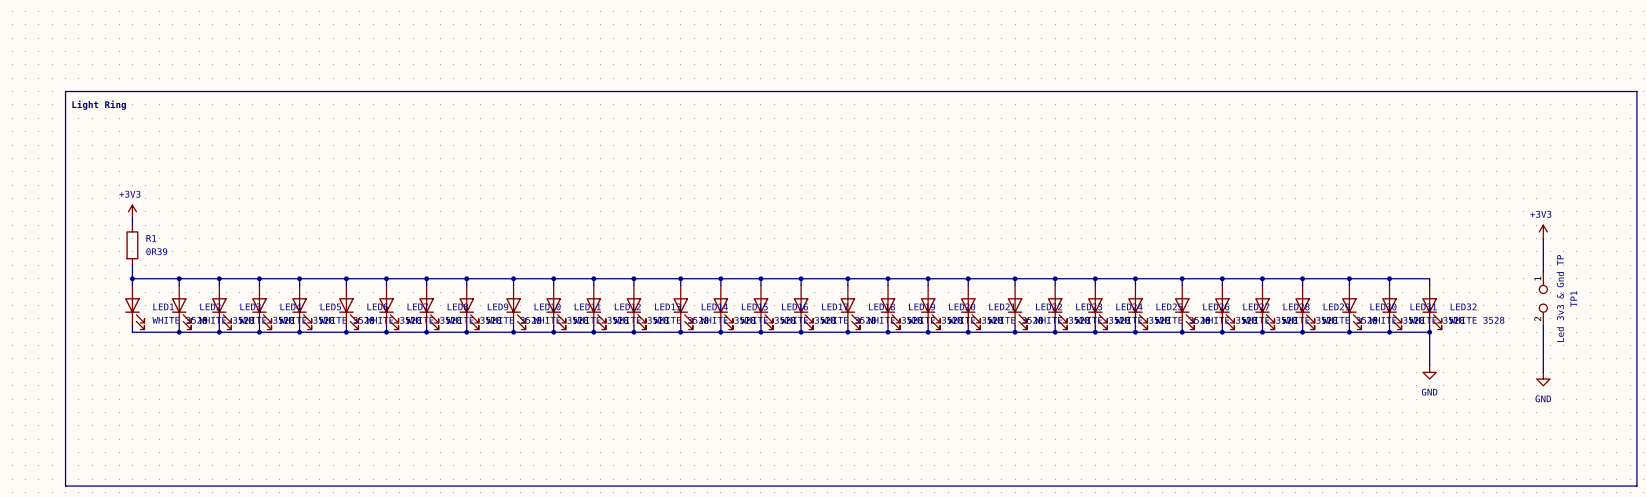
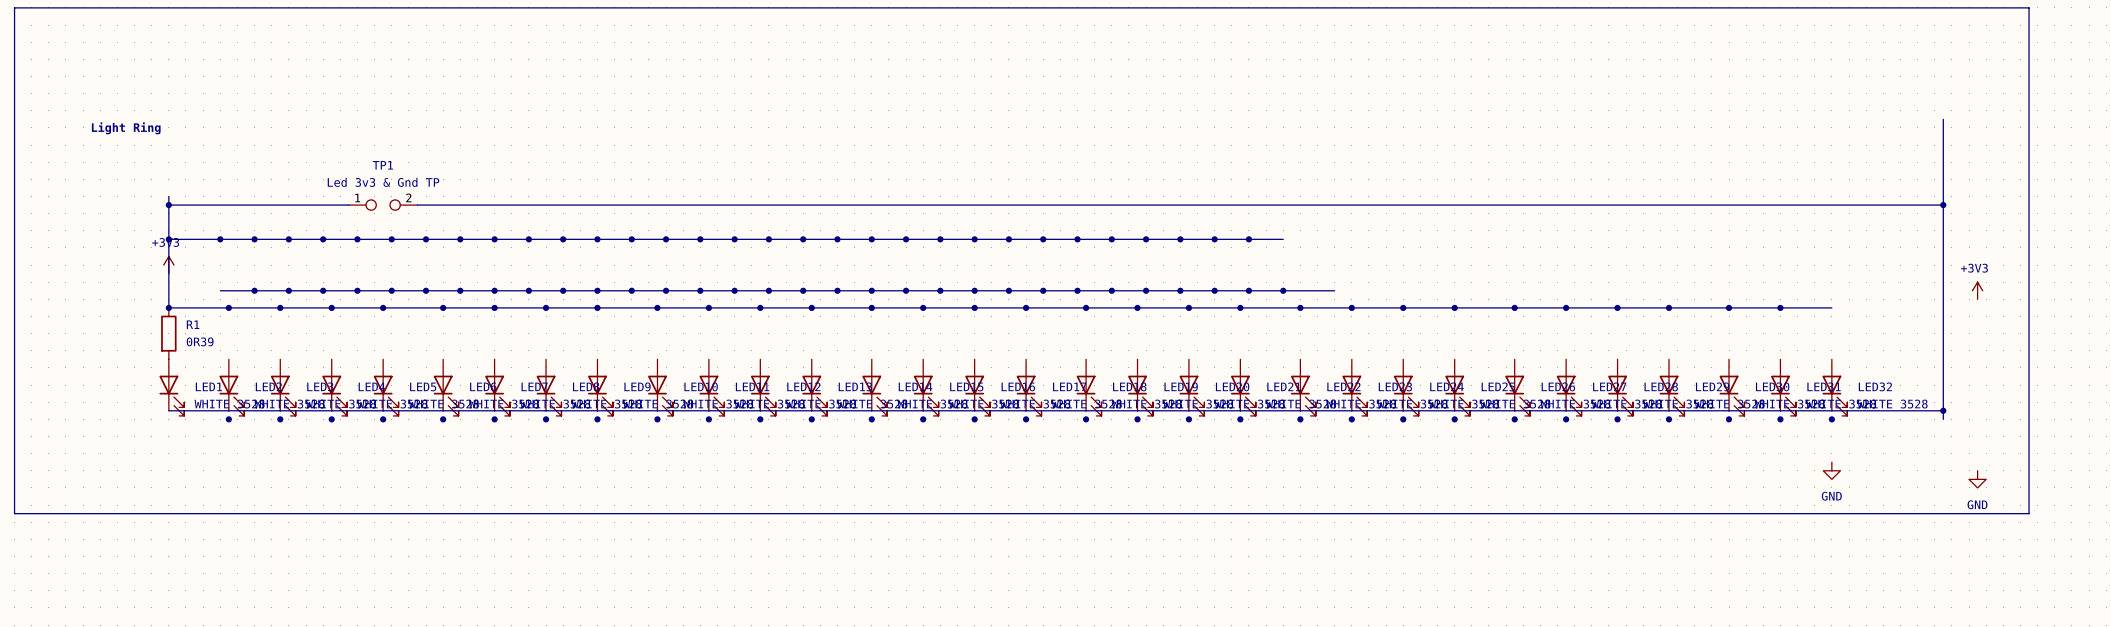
line: (65, 91) (1636, 91) (1636, 486) (65, 486) (65, 91) -> (14, 7) (2029, 7) (2029, 513) (14, 513) (14, 7)
wire: none -> (1943, 119) (1943, 419)
wire: none -> (168, 196) (168, 273)
wire: none -> (168, 205) (348, 205)
junction: none -> (168, 205)
wire: none -> (417, 205) (1943, 205)
junction: none -> (1943, 205)
wire: none -> (168, 239) (1283, 239)
junction: none -> (168, 239)
junction: none -> (220, 239)
junction: none -> (254, 239)
junction: none -> (288, 239)
junction: none -> (323, 239)
junction: none -> (357, 239)
junction: none -> (391, 239)
junction: none -> (426, 239)
junction: none -> (460, 239)
junction: none -> (494, 239)
junction: none -> (528, 239)
junction: none -> (563, 239)
junction: none -> (597, 239)
junction: none -> (631, 239)
junction: none -> (666, 239)
junction: none -> (700, 239)
junction: none -> (734, 239)
junction: none -> (768, 239)
junction: none -> (803, 239)
junction: none -> (837, 239)
junction: none -> (871, 239)
junction: none -> (906, 239)
junction: none -> (940, 239)
junction: none -> (974, 239)
junction: none -> (1008, 239)
junction: none -> (1043, 239)
junction: none -> (1077, 239)
junction: none -> (1111, 239)
junction: none -> (1146, 239)
junction: none -> (1180, 239)
junction: none -> (1214, 239)
junction: none -> (1248, 239)
wire: none -> (168, 282) (168, 307) (1831, 307)
wire: none -> (220, 290) (1334, 290)
junction: none -> (254, 290)
junction: none -> (288, 290)
junction: none -> (323, 290)
junction: none -> (357, 290)
junction: none -> (391, 290)
junction: none -> (426, 290)
junction: none -> (460, 290)
junction: none -> (494, 290)
junction: none -> (528, 290)
junction: none -> (563, 290)
junction: none -> (597, 290)
junction: none -> (631, 290)
junction: none -> (666, 290)
junction: none -> (700, 290)
junction: none -> (734, 290)
junction: none -> (768, 290)
junction: none -> (803, 290)
junction: none -> (837, 290)
junction: none -> (871, 290)
junction: none -> (906, 290)
junction: none -> (940, 290)
junction: none -> (974, 290)
junction: none -> (1008, 290)
junction: none -> (1043, 290)
junction: none -> (1077, 290)
junction: none -> (1111, 290)
junction: none -> (1146, 290)
junction: none -> (1180, 290)
junction: none -> (1214, 290)
junction: none -> (1248, 290)
junction: none -> (1283, 290)
wire: (1543, 238) (1543, 272) -> none
junction: none -> (168, 307)
R1 position: (132, 245) -> (168, 333)
junction: none -> (228, 307)
junction: none -> (280, 307)
junction: none -> (331, 307)
junction: none -> (383, 307)
junction: none -> (443, 307)
junction: none -> (494, 307)
junction: none -> (546, 307)
junction: none -> (597, 307)
junction: none -> (657, 307)
junction: none -> (708, 307)
junction: none -> (760, 307)
junction: none -> (811, 307)
junction: none -> (871, 307)
junction: none -> (923, 307)
junction: none -> (974, 307)
junction: none -> (1026, 307)
junction: none -> (1086, 307)
junction: none -> (1137, 307)
junction: none -> (1188, 307)
junction: none -> (1240, 307)
junction: none -> (1300, 307)
junction: none -> (1351, 307)
junction: none -> (1403, 307)
junction: none -> (1454, 307)
junction: none -> (1514, 307)
junction: none -> (1566, 307)
junction: none -> (1617, 307)
junction: none -> (1668, 307)
junction: none -> (1729, 307)
junction: none -> (1780, 307)
wire: (132, 265) (132, 285) -> none
wire: (132, 278) (1429, 278) (1429, 285) -> none
junction: (132, 278) -> none
wire: (179, 278) (179, 285) -> none
junction: (179, 278) -> none
wire: (219, 278) (219, 285) -> none
junction: (219, 278) -> none
wire: (259, 278) (259, 285) -> none
junction: (259, 278) -> none
wire: (299, 278) (299, 285) -> none
junction: (299, 278) -> none
wire: (346, 278) (346, 285) -> none
junction: (346, 278) -> none
wire: (386, 278) (386, 285) -> none
junction: (386, 278) -> none
wire: (426, 278) (426, 285) -> none
junction: (426, 278) -> none
wire: (466, 278) (466, 285) -> none
junction: (466, 278) -> none
wire: (513, 278) (513, 285) -> none
junction: (513, 278) -> none
wire: (553, 278) (553, 285) -> none
junction: (553, 278) -> none
wire: (593, 278) (593, 285) -> none
junction: (593, 278) -> none
wire: (633, 278) (633, 285) -> none
junction: (633, 278) -> none
wire: (680, 278) (680, 285) -> none
junction: (680, 278) -> none
wire: (720, 278) (720, 285) -> none
junction: (720, 278) -> none
wire: (760, 278) (760, 285) -> none
junction: (760, 278) -> none
wire: (801, 278) (801, 285) -> none
junction: (801, 278) -> none
wire: (847, 278) (847, 285) -> none
junction: (847, 278) -> none
wire: (888, 278) (888, 285) -> none
junction: (888, 278) -> none
wire: (928, 278) (928, 285) -> none
junction: (928, 278) -> none
wire: (968, 278) (968, 285) -> none
junction: (968, 278) -> none
wire: (1015, 278) (1015, 285) -> none
junction: (1015, 278) -> none
wire: (1055, 278) (1055, 285) -> none
junction: (1055, 278) -> none
wire: (1095, 278) (1095, 285) -> none
junction: (1095, 278) -> none
wire: (1135, 278) (1135, 285) -> none
junction: (1135, 278) -> none
wire: (1182, 278) (1182, 285) -> none
junction: (1182, 278) -> none
wire: (1222, 278) (1222, 285) -> none
junction: (1222, 278) -> none
wire: (1262, 278) (1262, 285) -> none
junction: (1262, 278) -> none
wire: (1302, 278) (1302, 285) -> none
junction: (1302, 278) -> none
wire: (1349, 278) (1349, 285) -> none
junction: (1349, 278) -> none
wire: (1389, 278) (1389, 285) -> none
junction: (1389, 278) -> none
TP1 rotation: 0° (1543, 298) -> 90° counterclockwise (383, 205)
TP1 position: (1543, 298) -> (383, 205)
wire: (132, 325) (132, 332) (1429, 332) -> (168, 410) (1943, 410)
wire: (179, 325) (179, 332) -> none
wire: (219, 325) (219, 332) -> none
wire: (259, 325) (259, 332) -> none
wire: (299, 325) (299, 332) -> none
wire: (346, 325) (346, 332) -> none
wire: (386, 325) (386, 332) -> none
wire: (426, 325) (426, 332) -> none
wire: (466, 325) (466, 332) -> none
wire: (513, 325) (513, 332) -> none
wire: (553, 325) (553, 332) -> none
wire: (593, 325) (593, 332) -> none
wire: (633, 325) (633, 332) -> none
wire: (680, 325) (680, 332) -> none
wire: (720, 325) (720, 332) -> none
wire: (760, 325) (760, 332) -> none
wire: (801, 325) (801, 332) -> none
wire: (847, 325) (847, 332) -> none
wire: (888, 325) (888, 332) -> none
wire: (928, 325) (928, 332) -> none
wire: (968, 325) (968, 332) -> none
wire: (1015, 325) (1015, 332) -> none
wire: (1055, 325) (1055, 332) -> none
wire: (1095, 325) (1095, 332) -> none
wire: (1135, 325) (1135, 332) -> none
wire: (1182, 325) (1182, 332) -> none
wire: (1222, 325) (1222, 332) -> none
wire: (1262, 325) (1262, 332) -> none
wire: (1302, 325) (1302, 332) -> none
wire: (1349, 325) (1349, 332) -> none
wire: (1389, 325) (1389, 332) -> none
wire: (1429, 325) (1429, 365) -> none
junction: none -> (1943, 410)
wire: (1543, 325) (1543, 372) -> none

